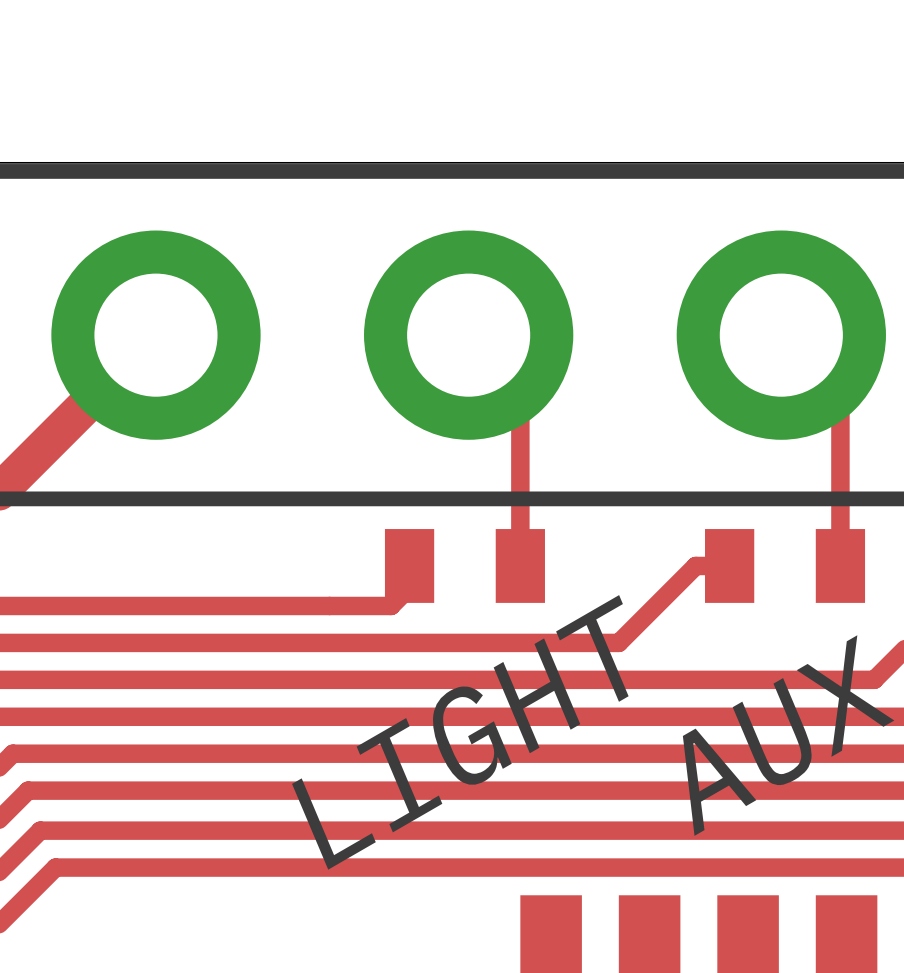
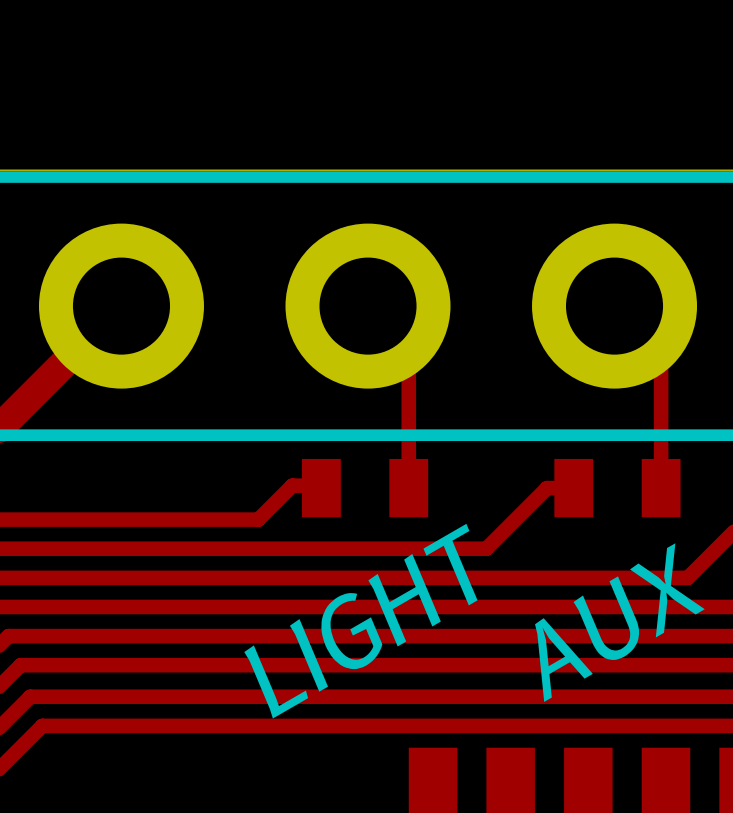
track: (409, 565) (409, 587) (391, 605) (329, 605) -> (321, 485) (292, 485) (258, 519)

